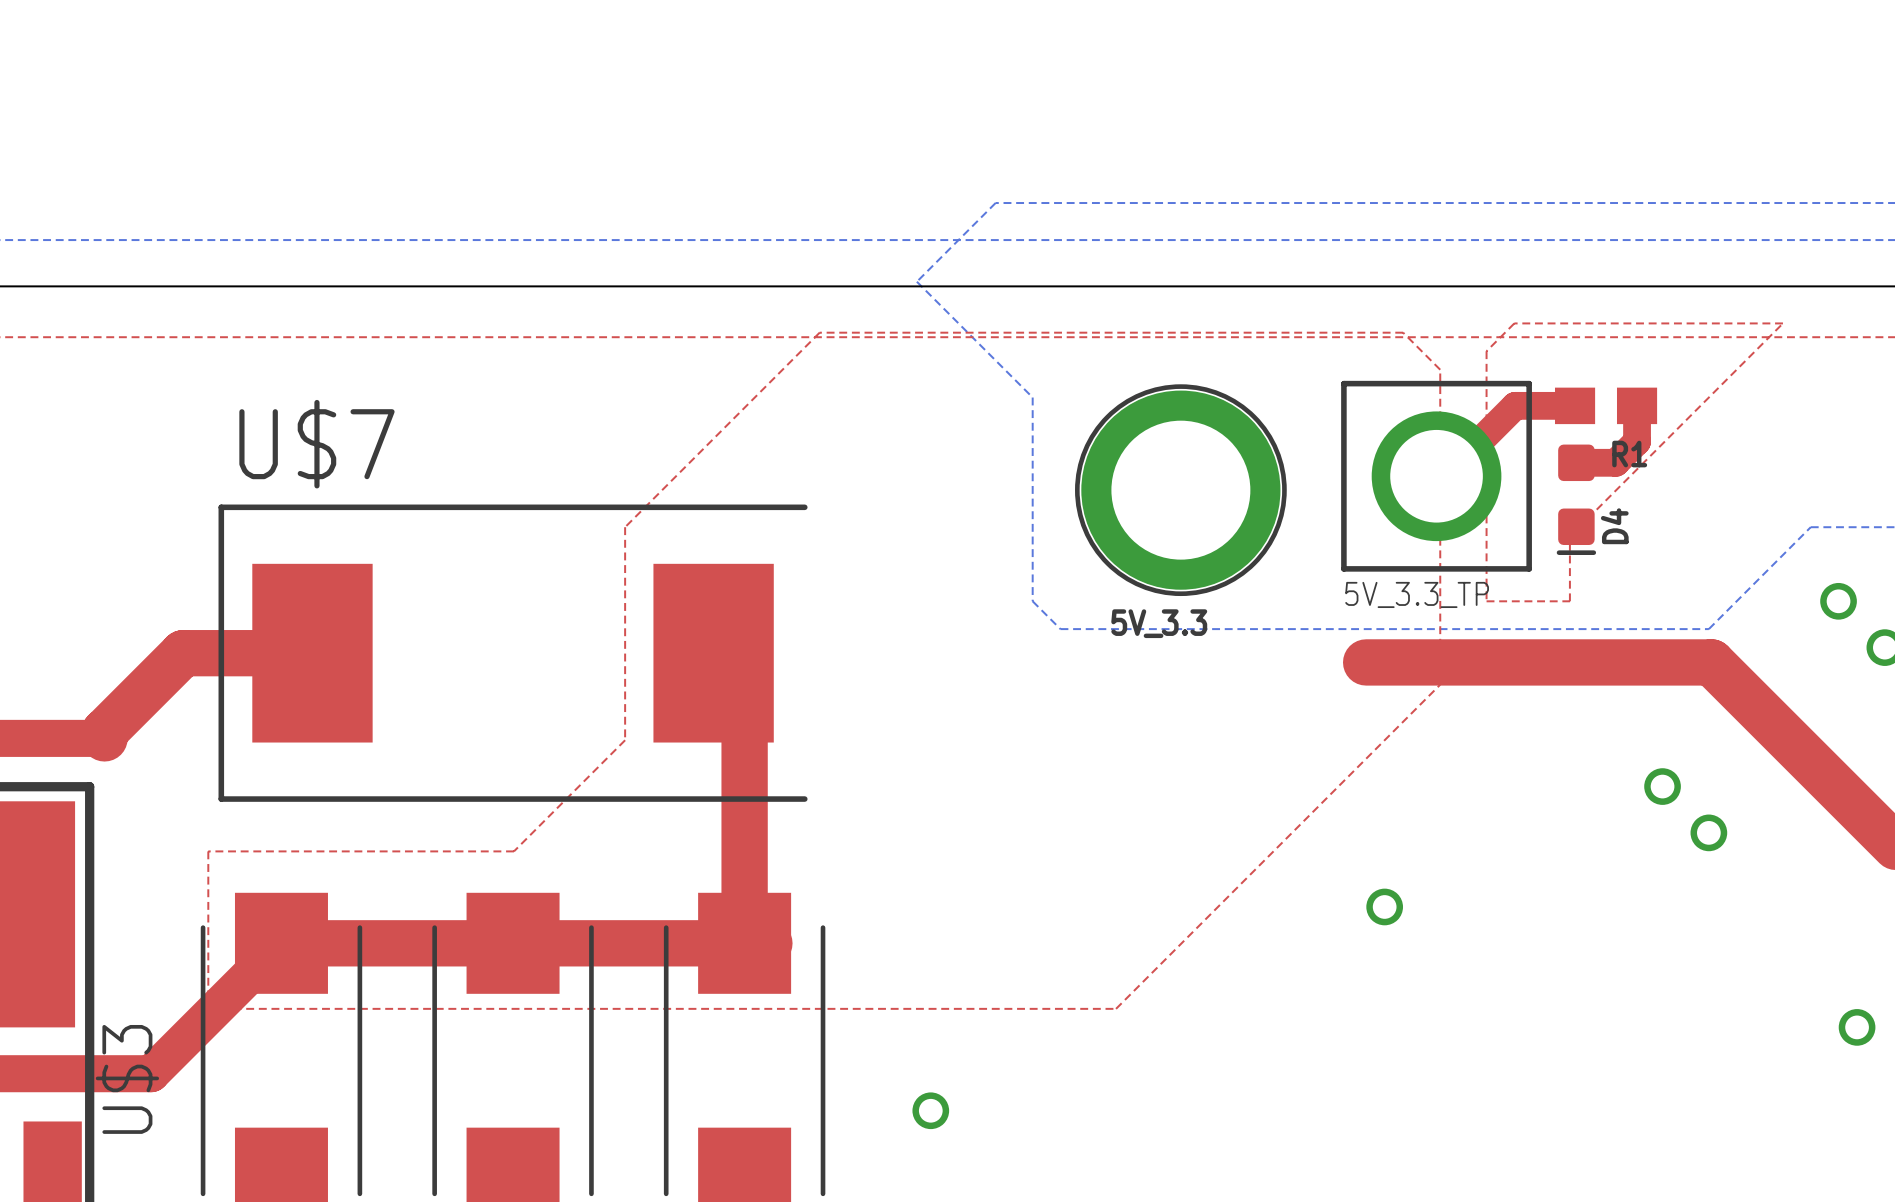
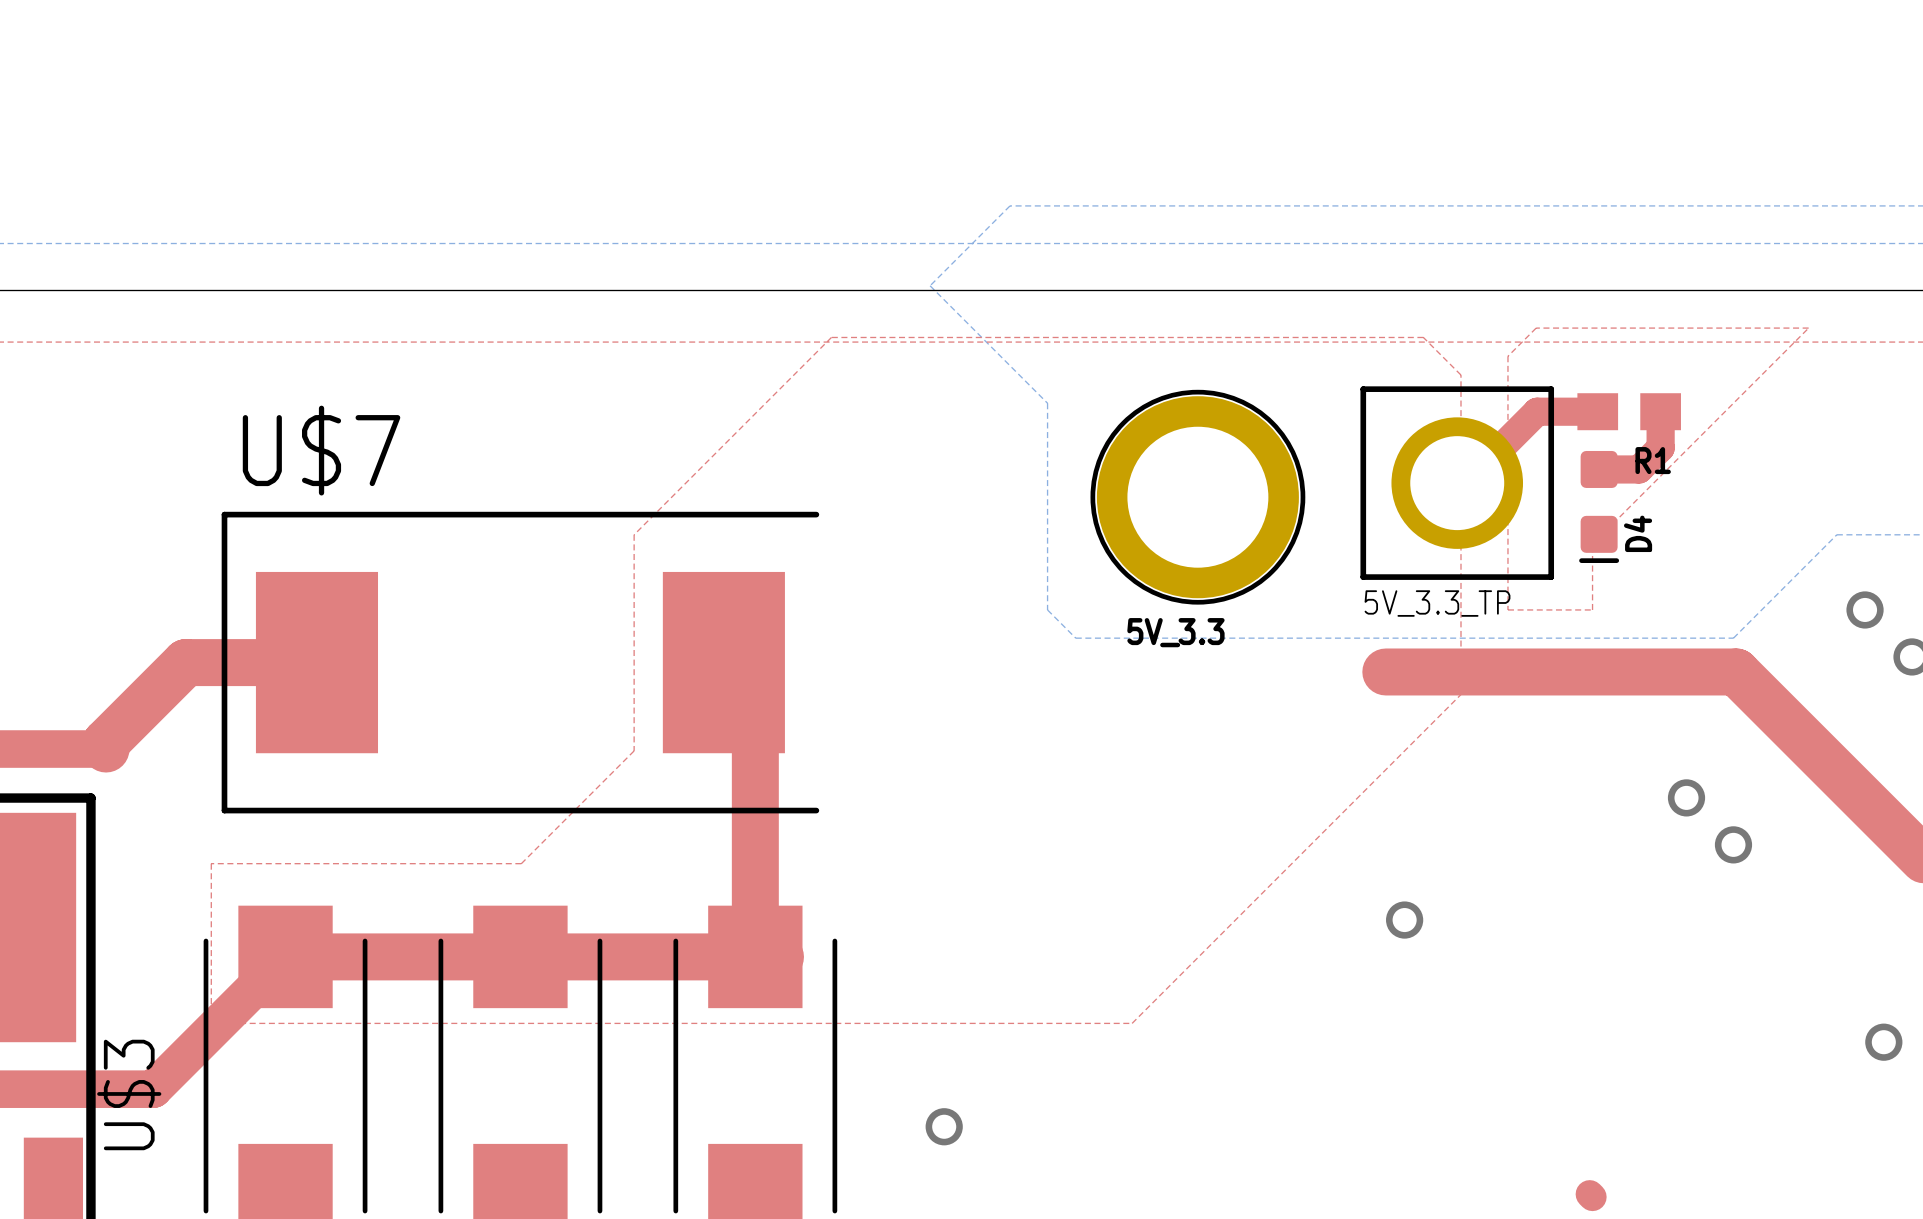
top track: none -> (1589, 1194) (1592, 1197)

